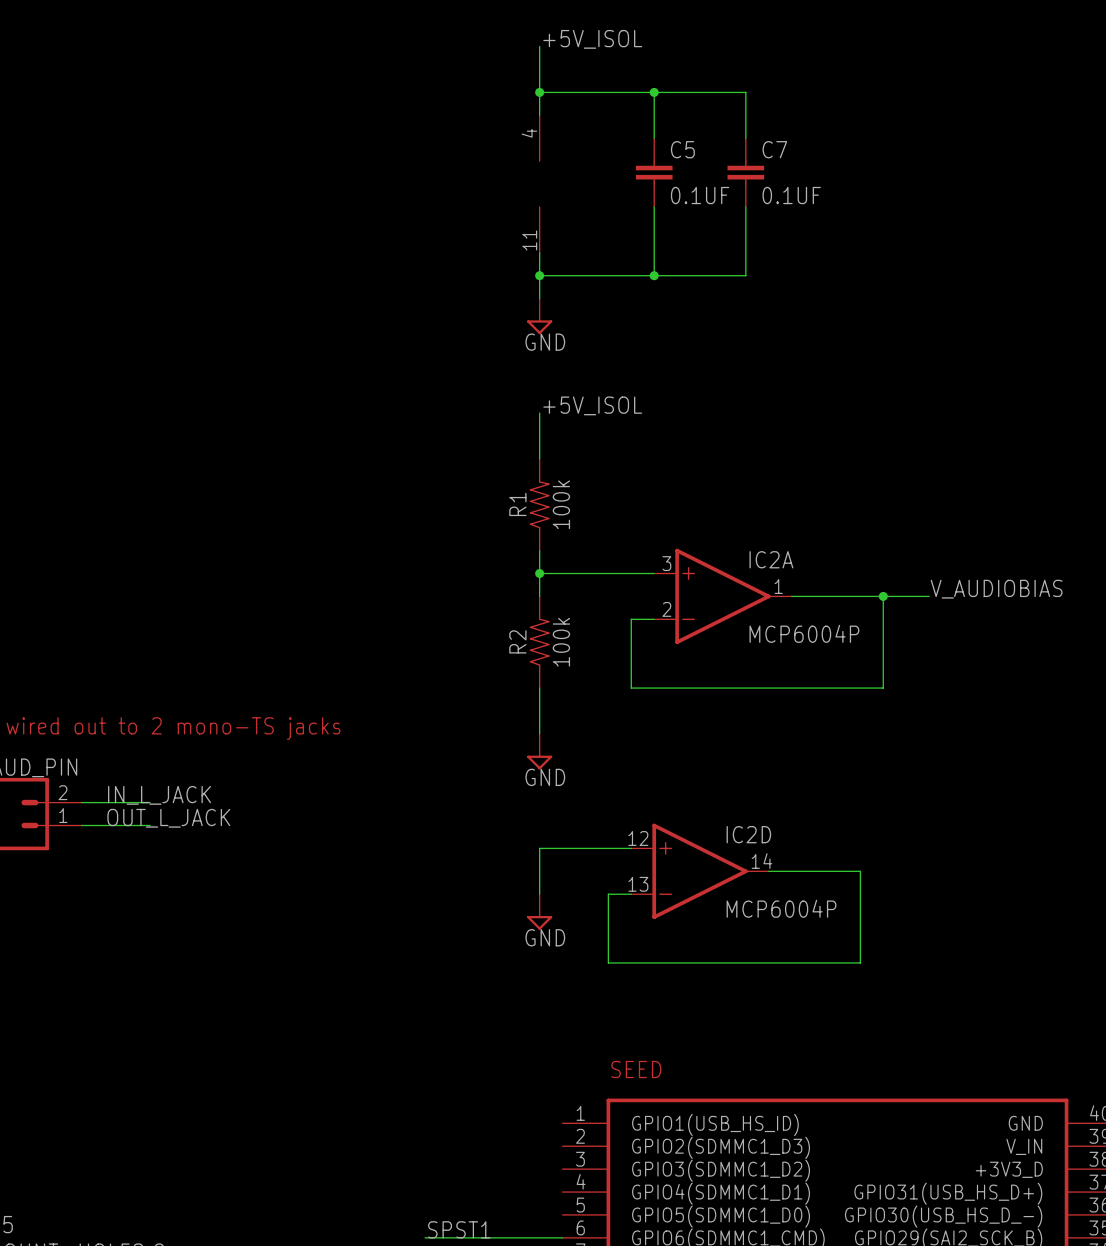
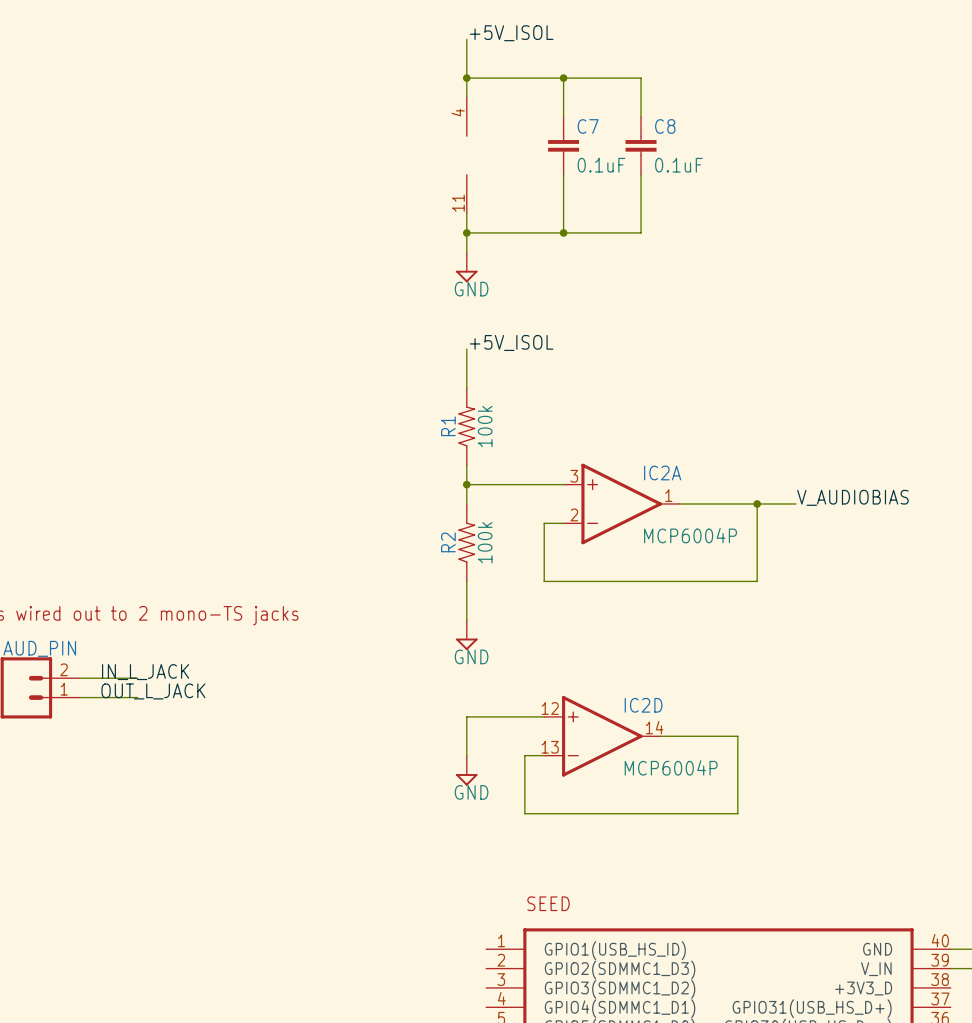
C5 name: C5 (682, 149) -> C7 (588, 126)
C7 name: C7 (774, 149) -> C8 (665, 126)
C5 value: 0.1UF (700, 195) -> 0.1uF (601, 165)
C7 value: 0.1UF (791, 195) -> 0.1uF (678, 165)

